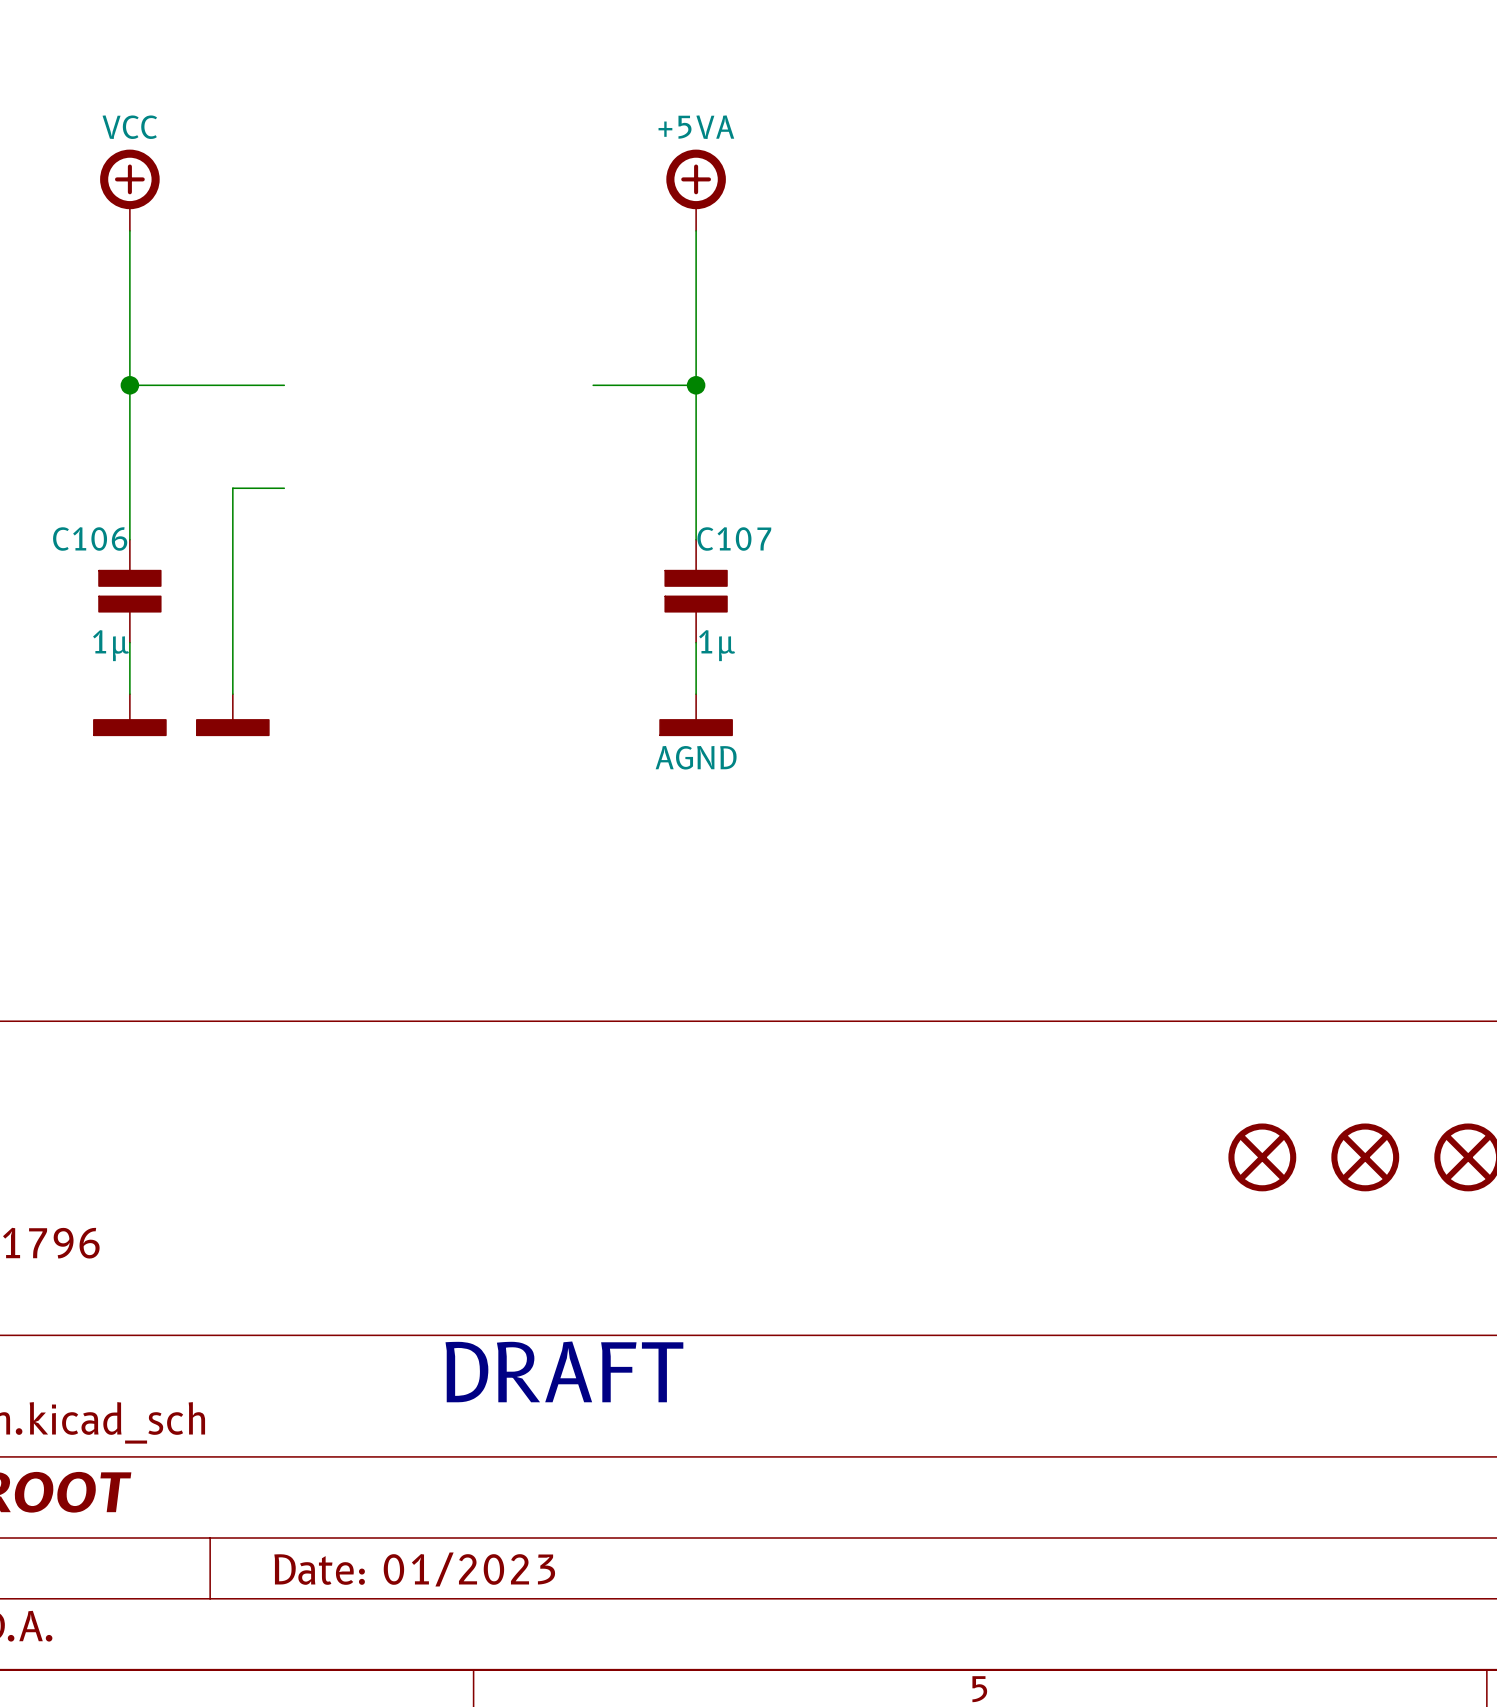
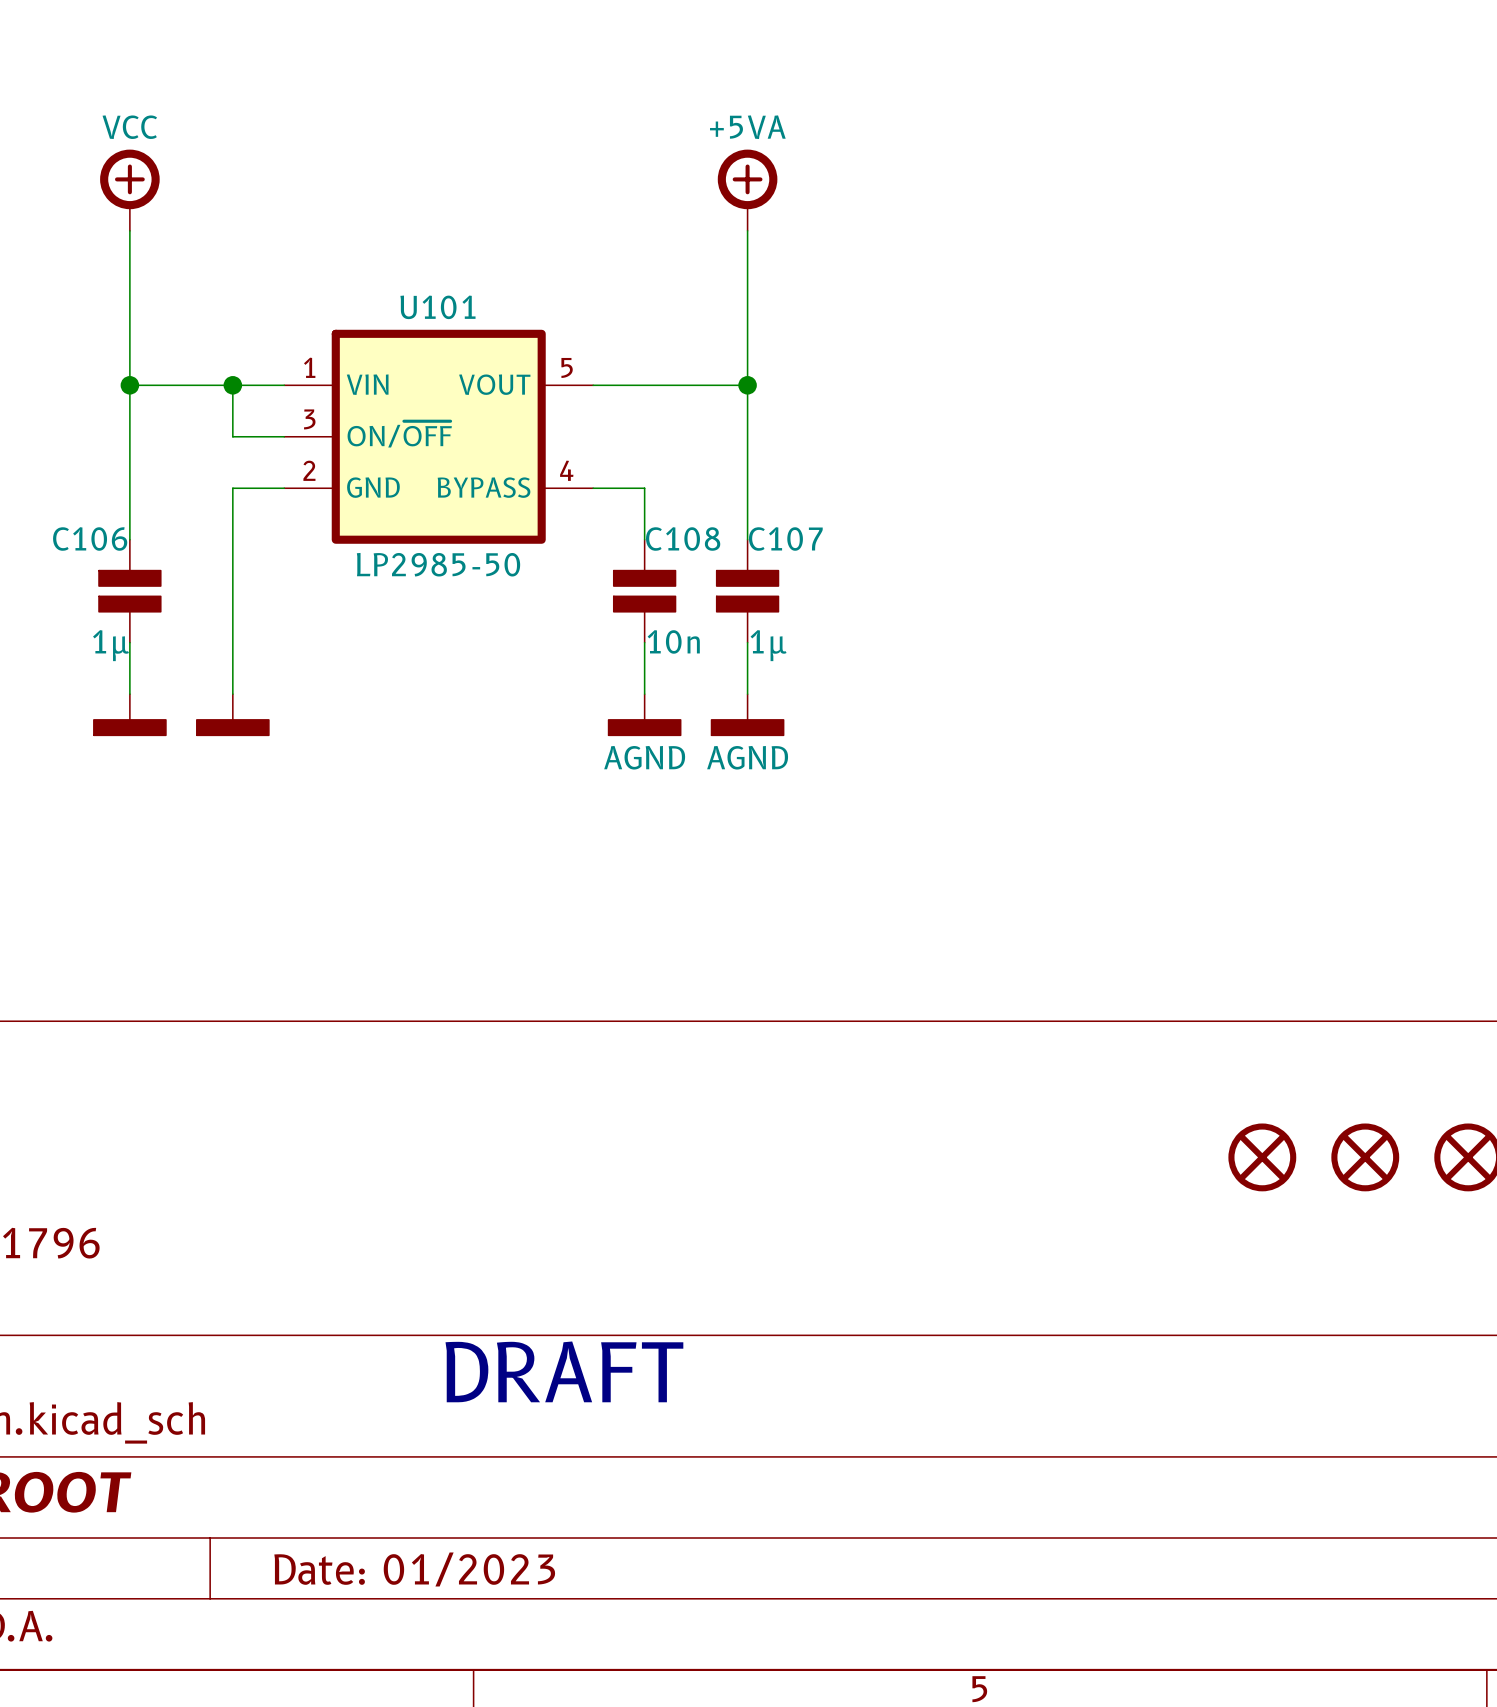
power symbol position: (696, 190) -> (747, 190)
wire: (696, 230) (696, 539) -> (747, 230) (747, 539)
wire: none -> (232, 385) (232, 436) (284, 436)
junction: none -> (232, 385)
wire: none -> (696, 385) (747, 385)
junction position: (696, 385) -> (747, 385)
U101: none -> LP2985-50 (438, 436)
wire: none -> (593, 488) (644, 488) (644, 539)
C108: none -> 10n (644, 591)
C107 position: (696, 591) -> (747, 591)
wire: none -> (644, 642) (644, 694)
wire: (696, 642) (696, 694) -> (747, 642) (747, 694)
power symbol: none -> (644, 714)
power symbol: (696, 714) -> none
power symbol: none -> (747, 714)

